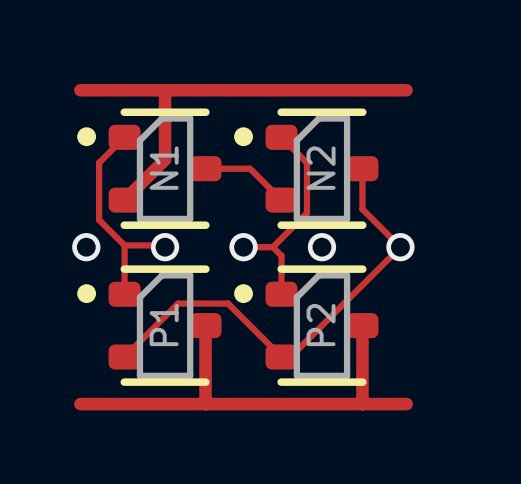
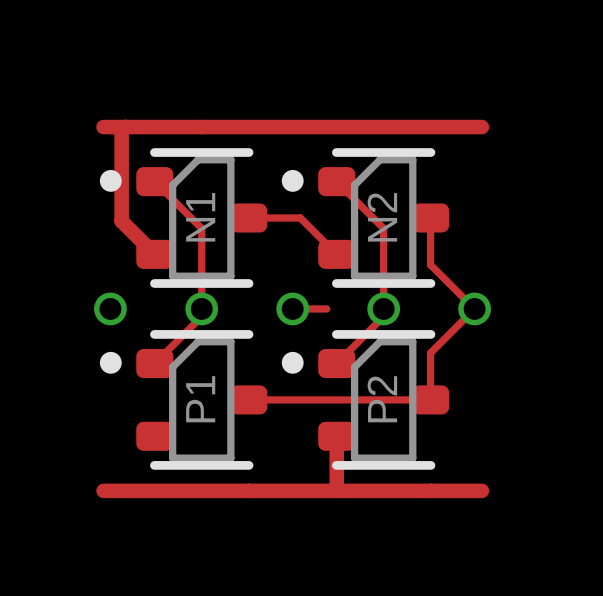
track: (165, 90) (165, 159) (124, 200) -> (125, 127) (121, 130) (121, 221) (154, 254)
track: (124, 137) (99, 162) (99, 219) (124, 245) -> (154, 181) (201, 228) (201, 316) (154, 363)
track: (306, 162) (306, 213) (272, 247) (281, 255) (281, 294) -> (366, 211) (383, 228) (383, 316) (336, 363)
track: (124, 245) (163, 245) (165, 247) -> none
track: (124, 245) (124, 294) -> none
track: (362, 285) (290, 357) (281, 357) (228, 303) (177, 303) (124, 357) -> (430, 352) (430, 399) (248, 399)
track: (205, 325) (205, 403) -> none
track: (362, 325) (362, 403) -> none
track: none -> (336, 436) (336, 490)

